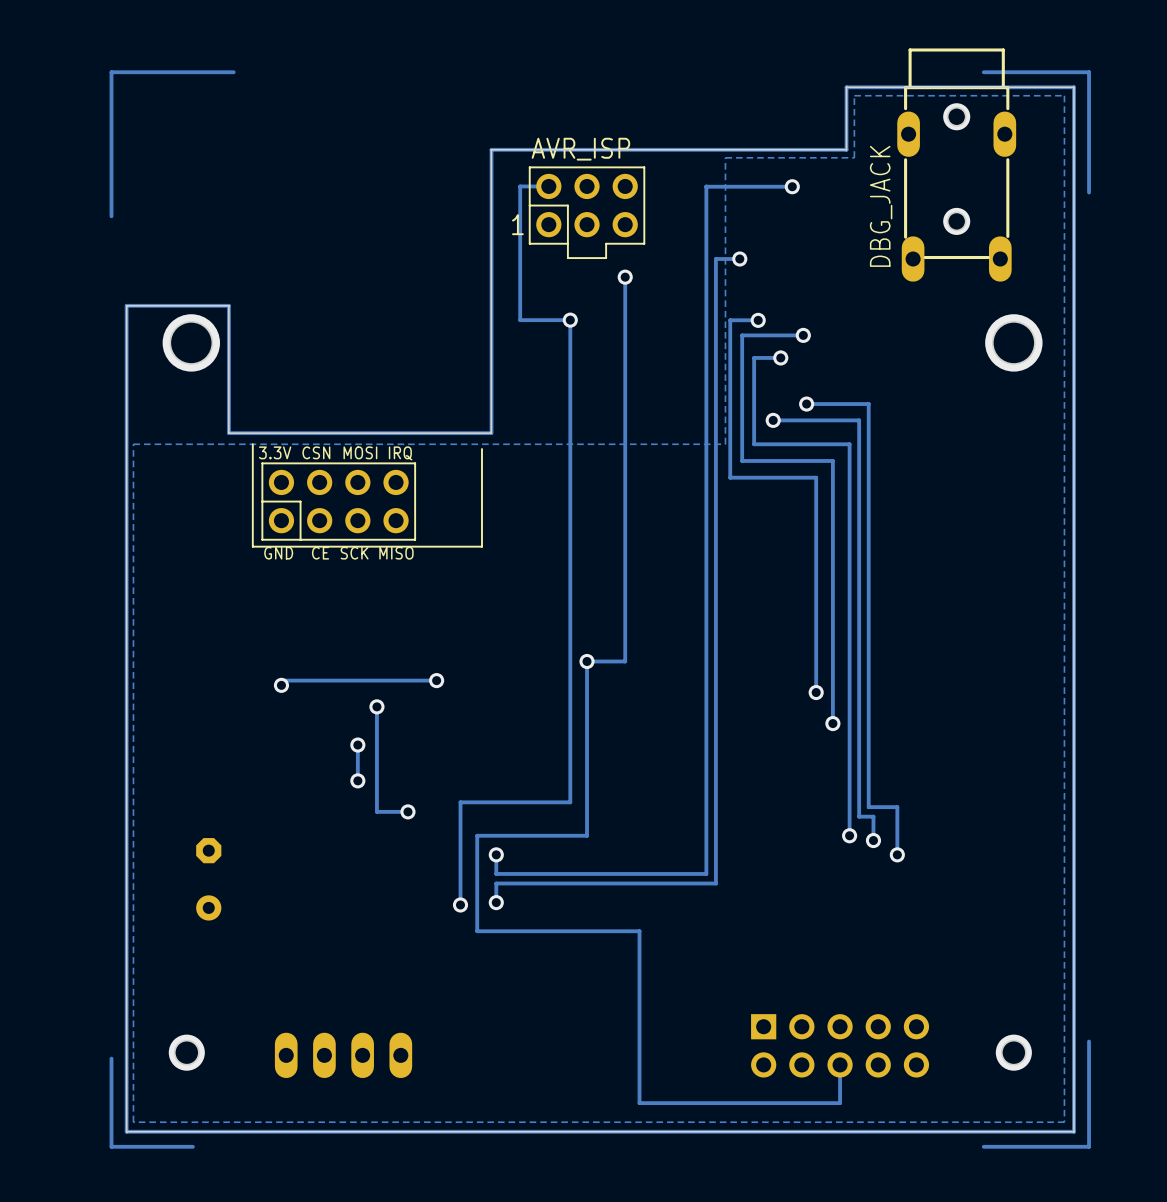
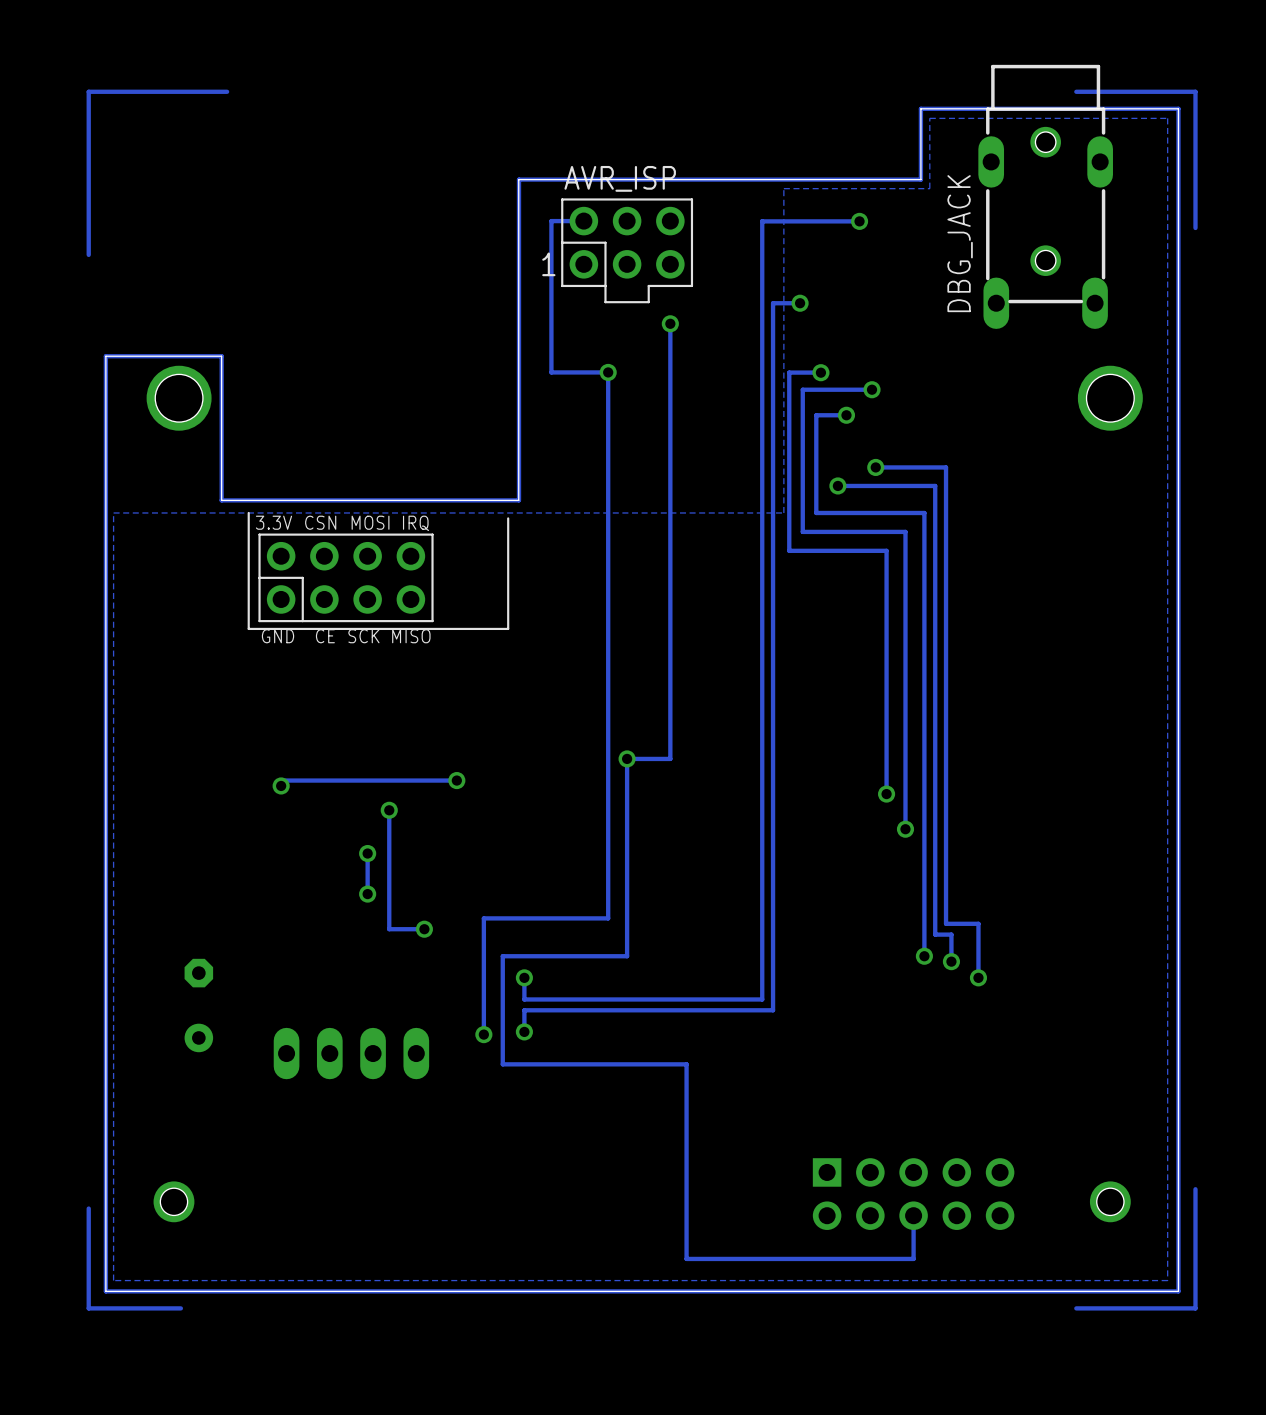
part position: (343, 1055) -> (351, 1053)

